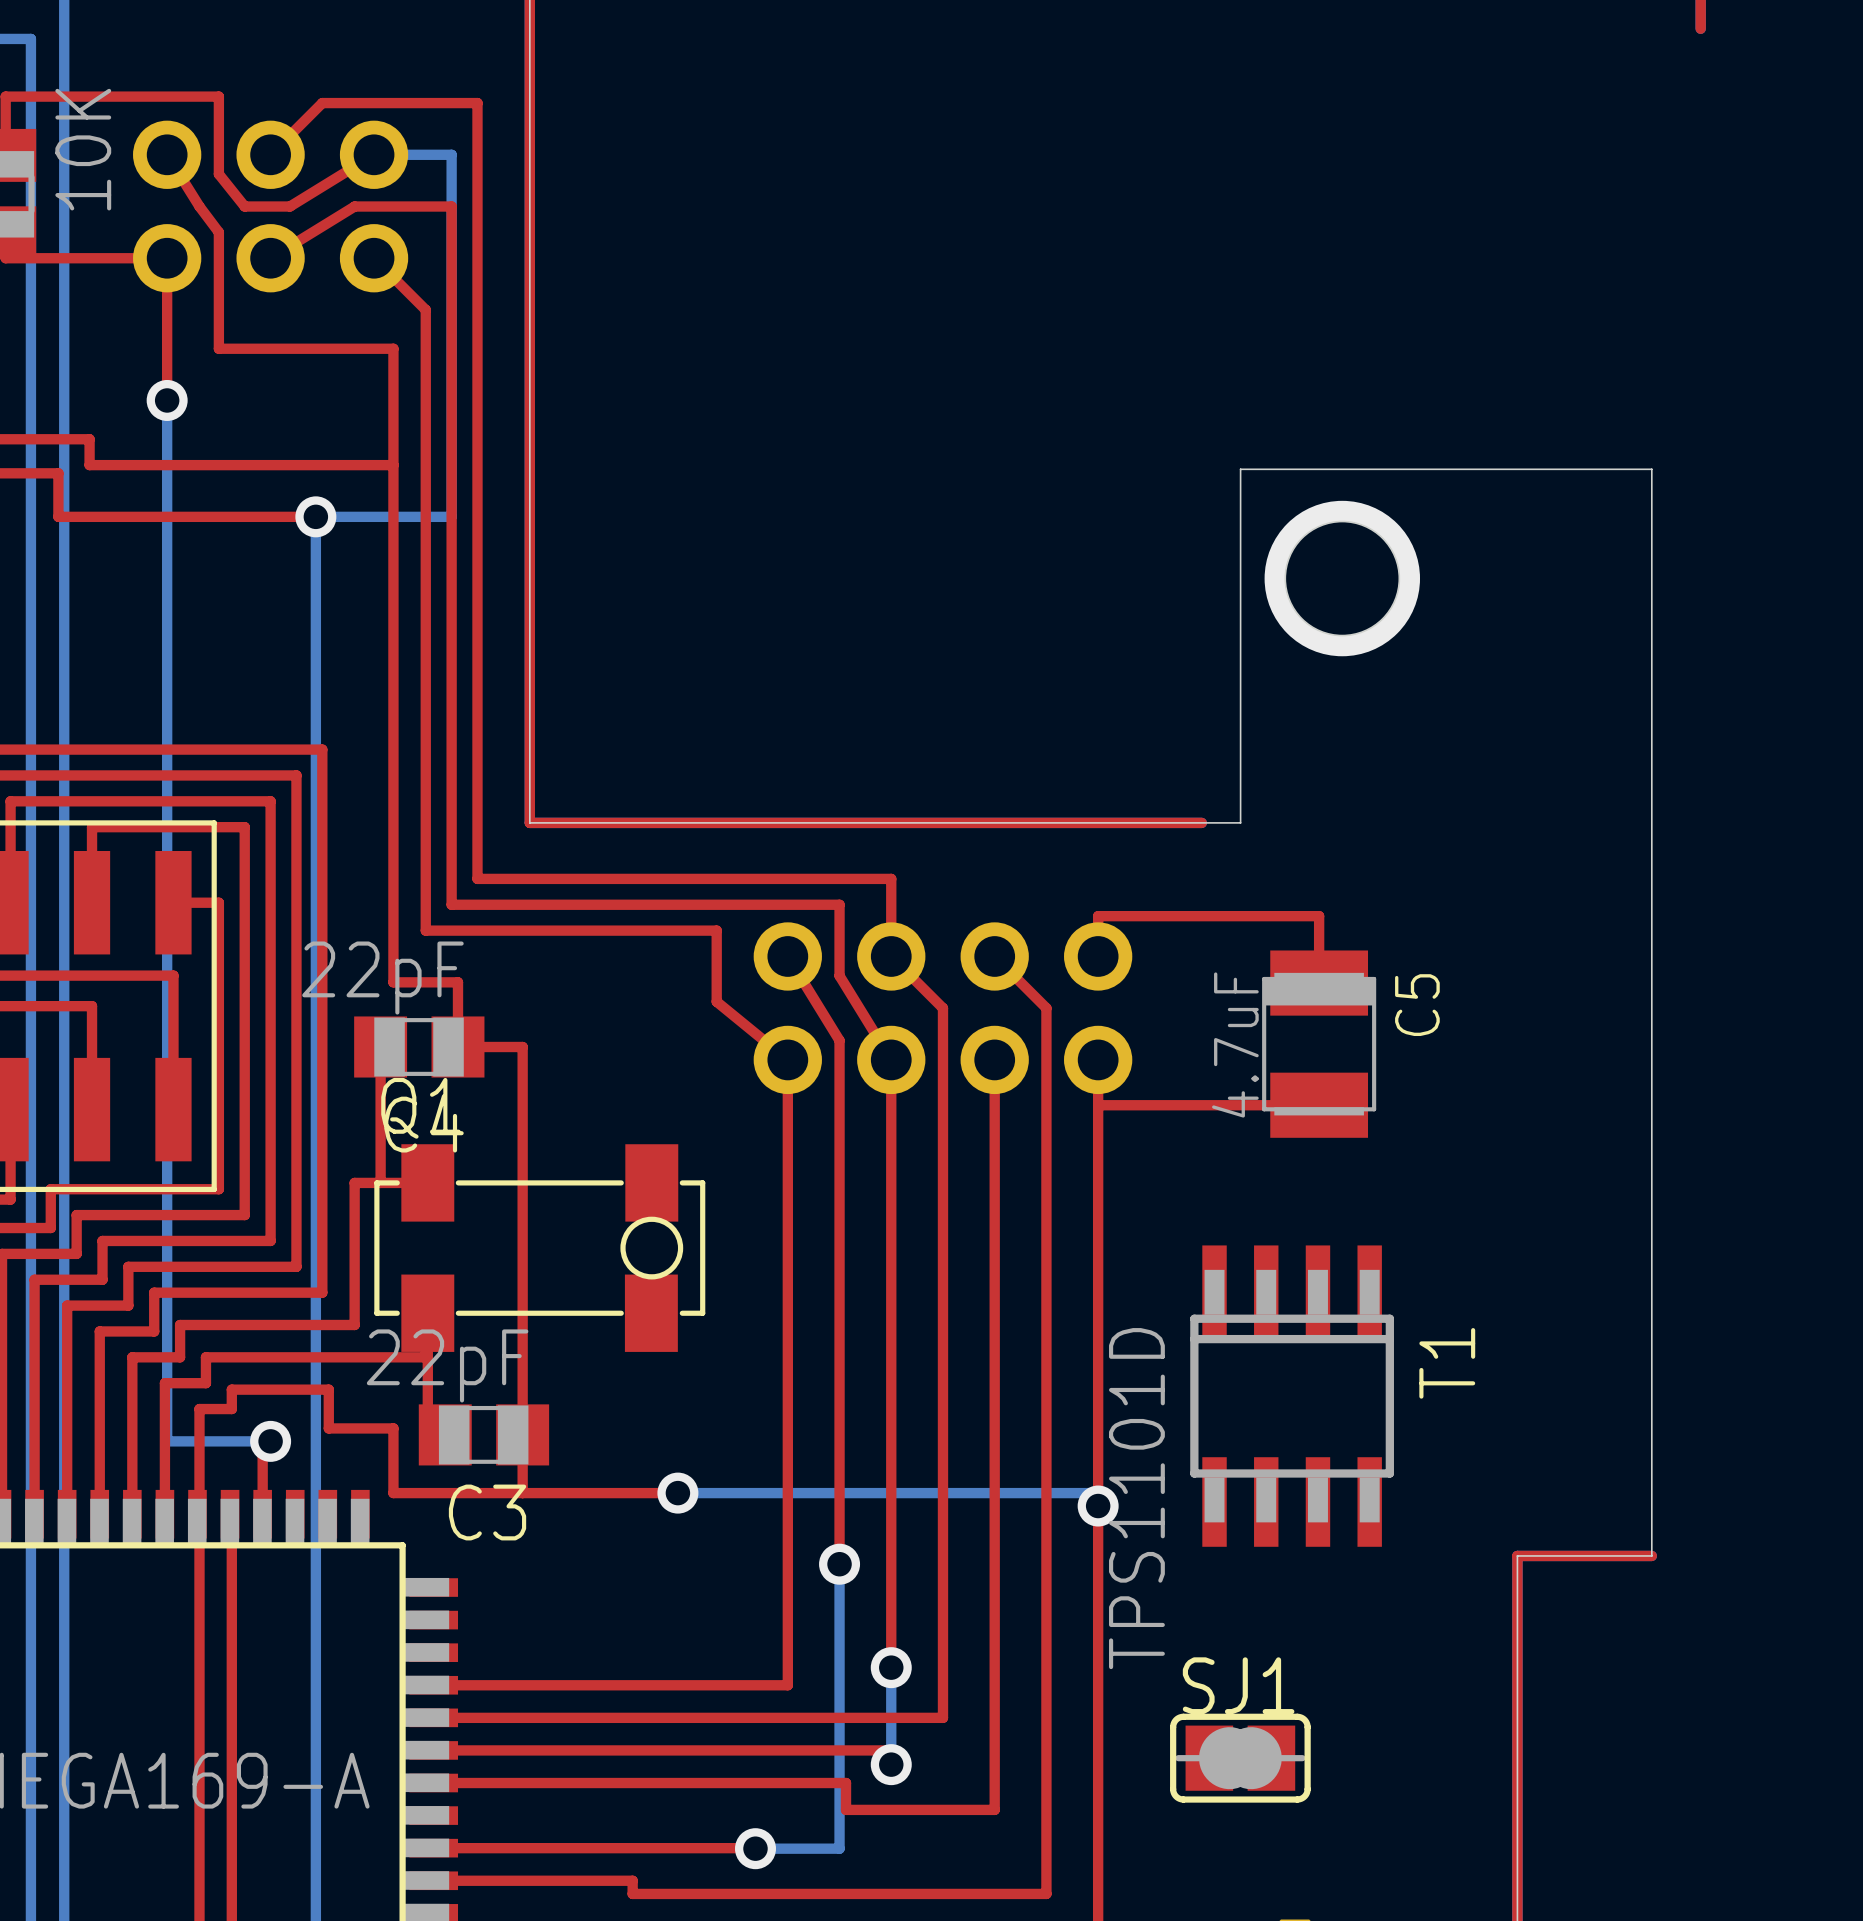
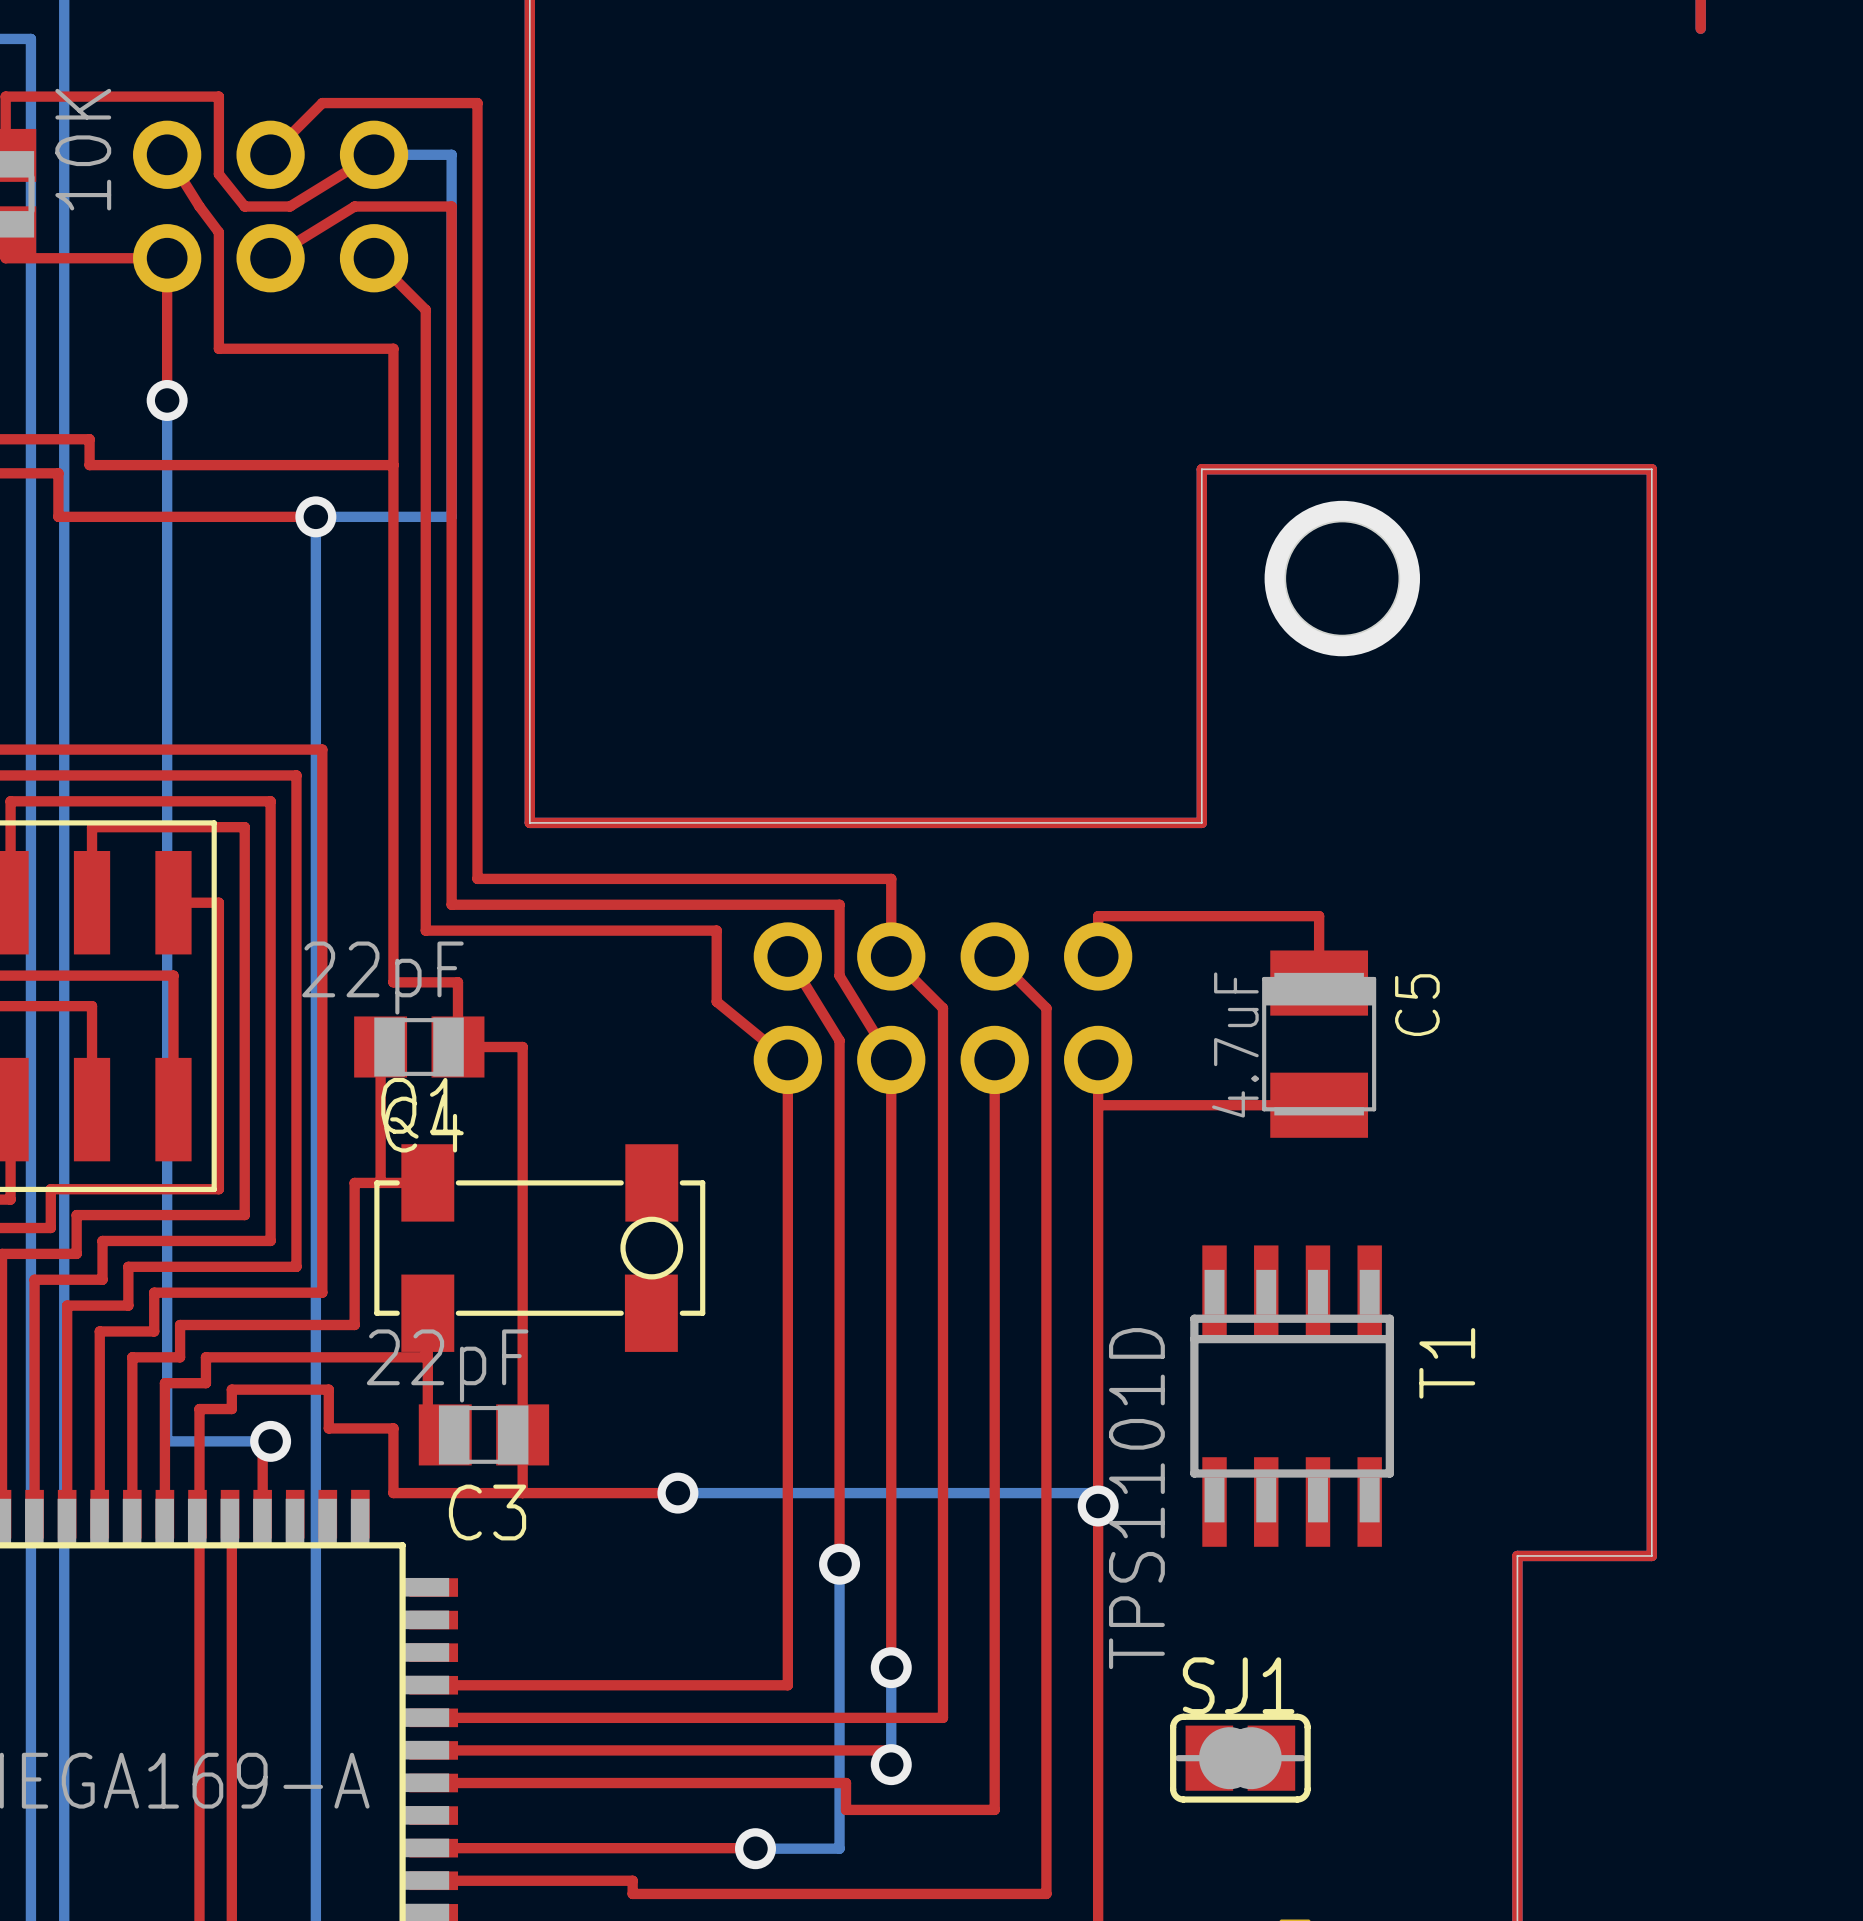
board edge: (1240, 469) (1240, 822) (1201, 822) -> (1240, 469) (1201, 469) (1201, 822)
top track: none -> (1201, 822) (1201, 469) (1651, 469) (1651, 1555)

